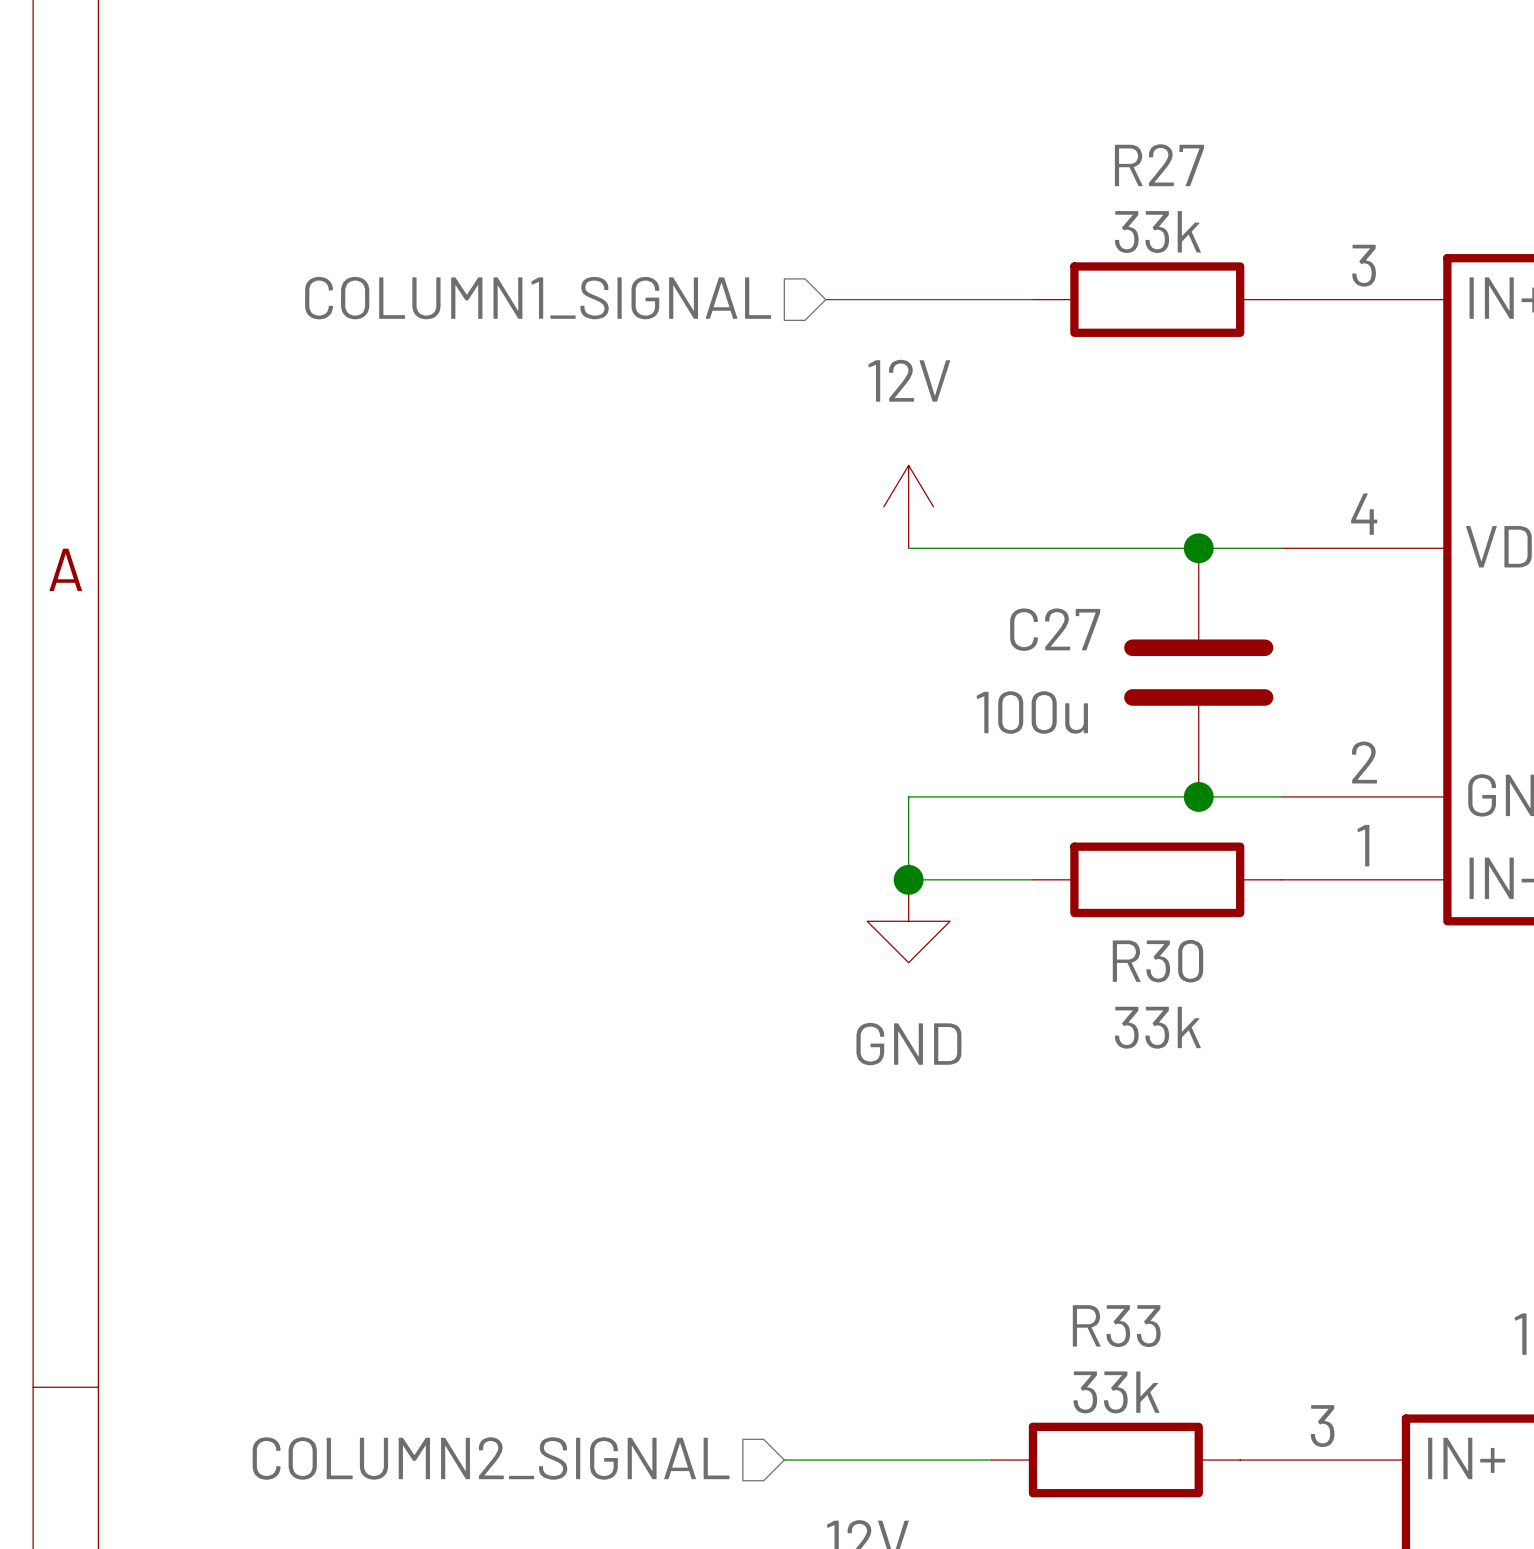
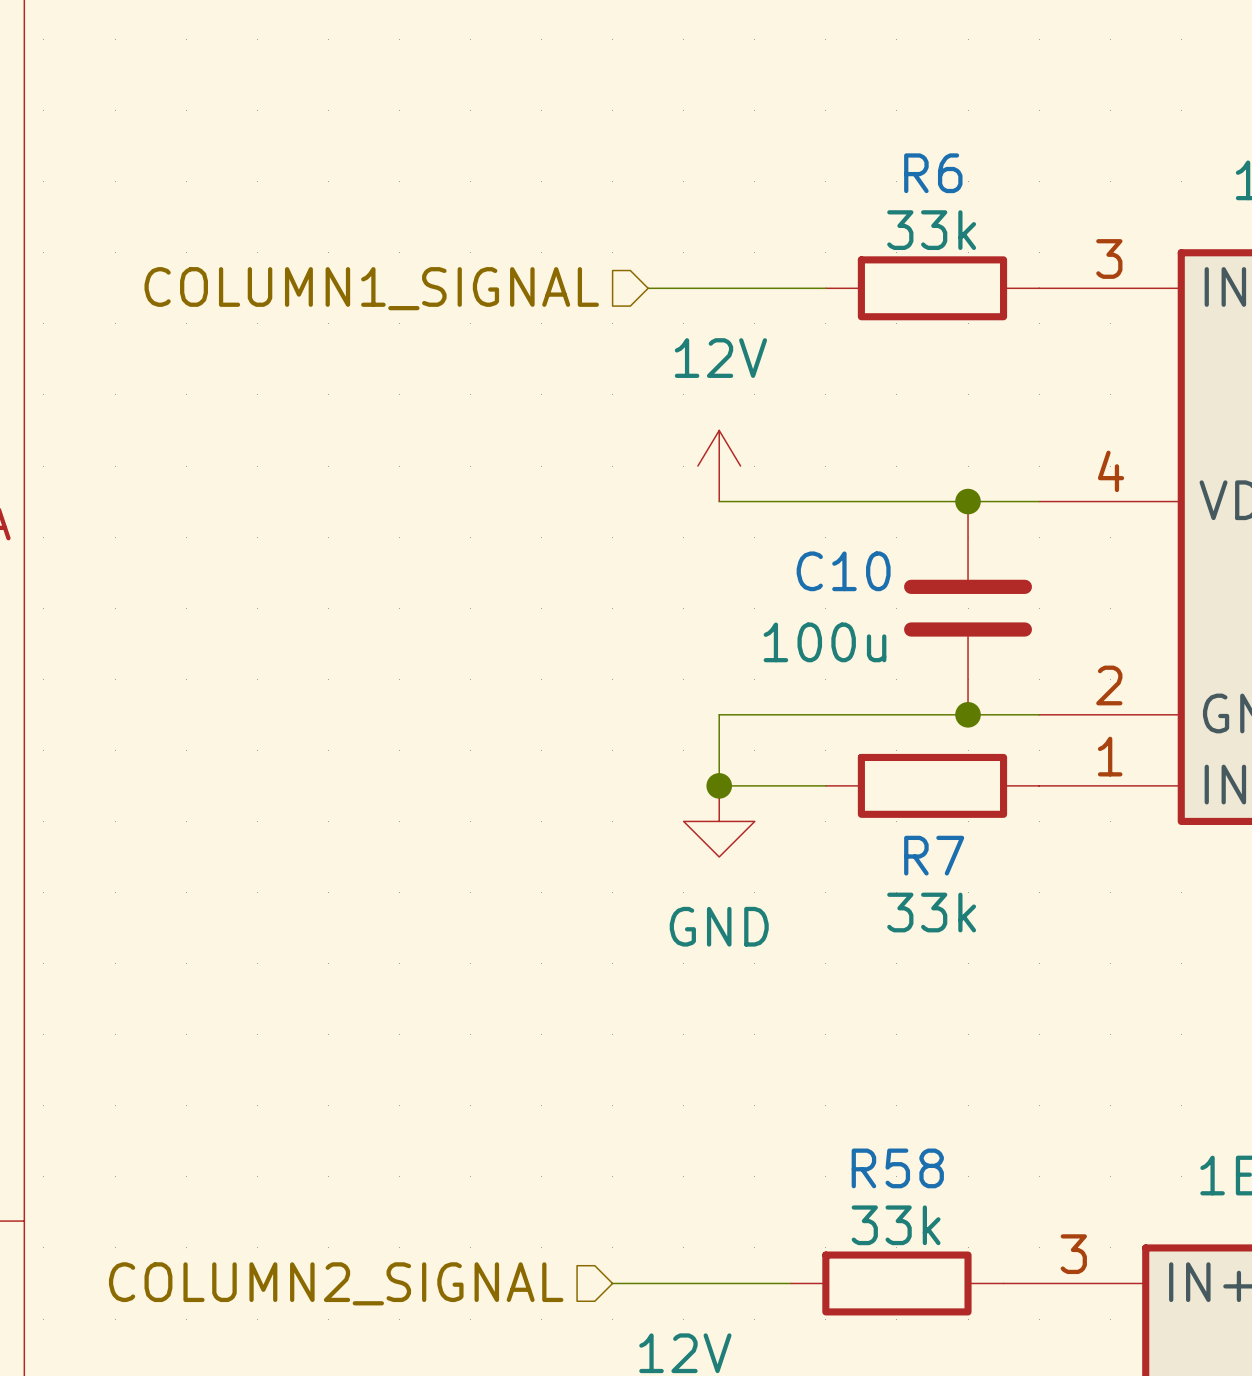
R27 name: R27 (1159, 165) -> R6 (933, 173)
C27 name: C27 (1055, 629) -> C10 (843, 571)
R30 name: R30 (1157, 961) -> R7 (934, 855)
R33 name: R33 (1116, 1326) -> R58 (897, 1168)

